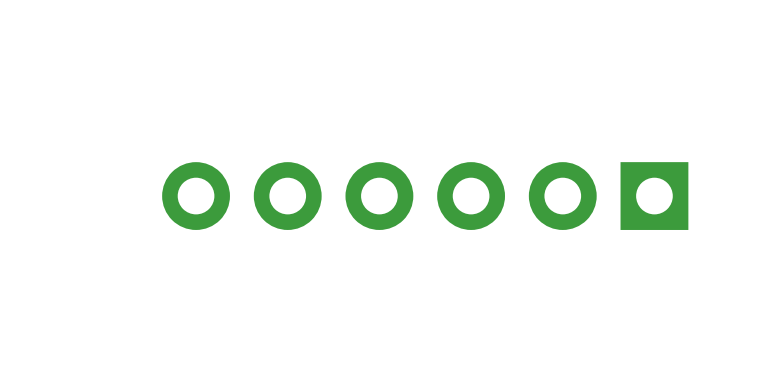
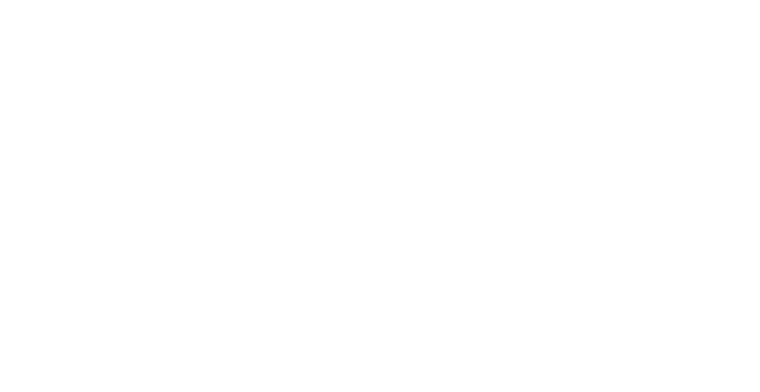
part: (425, 196) -> none

